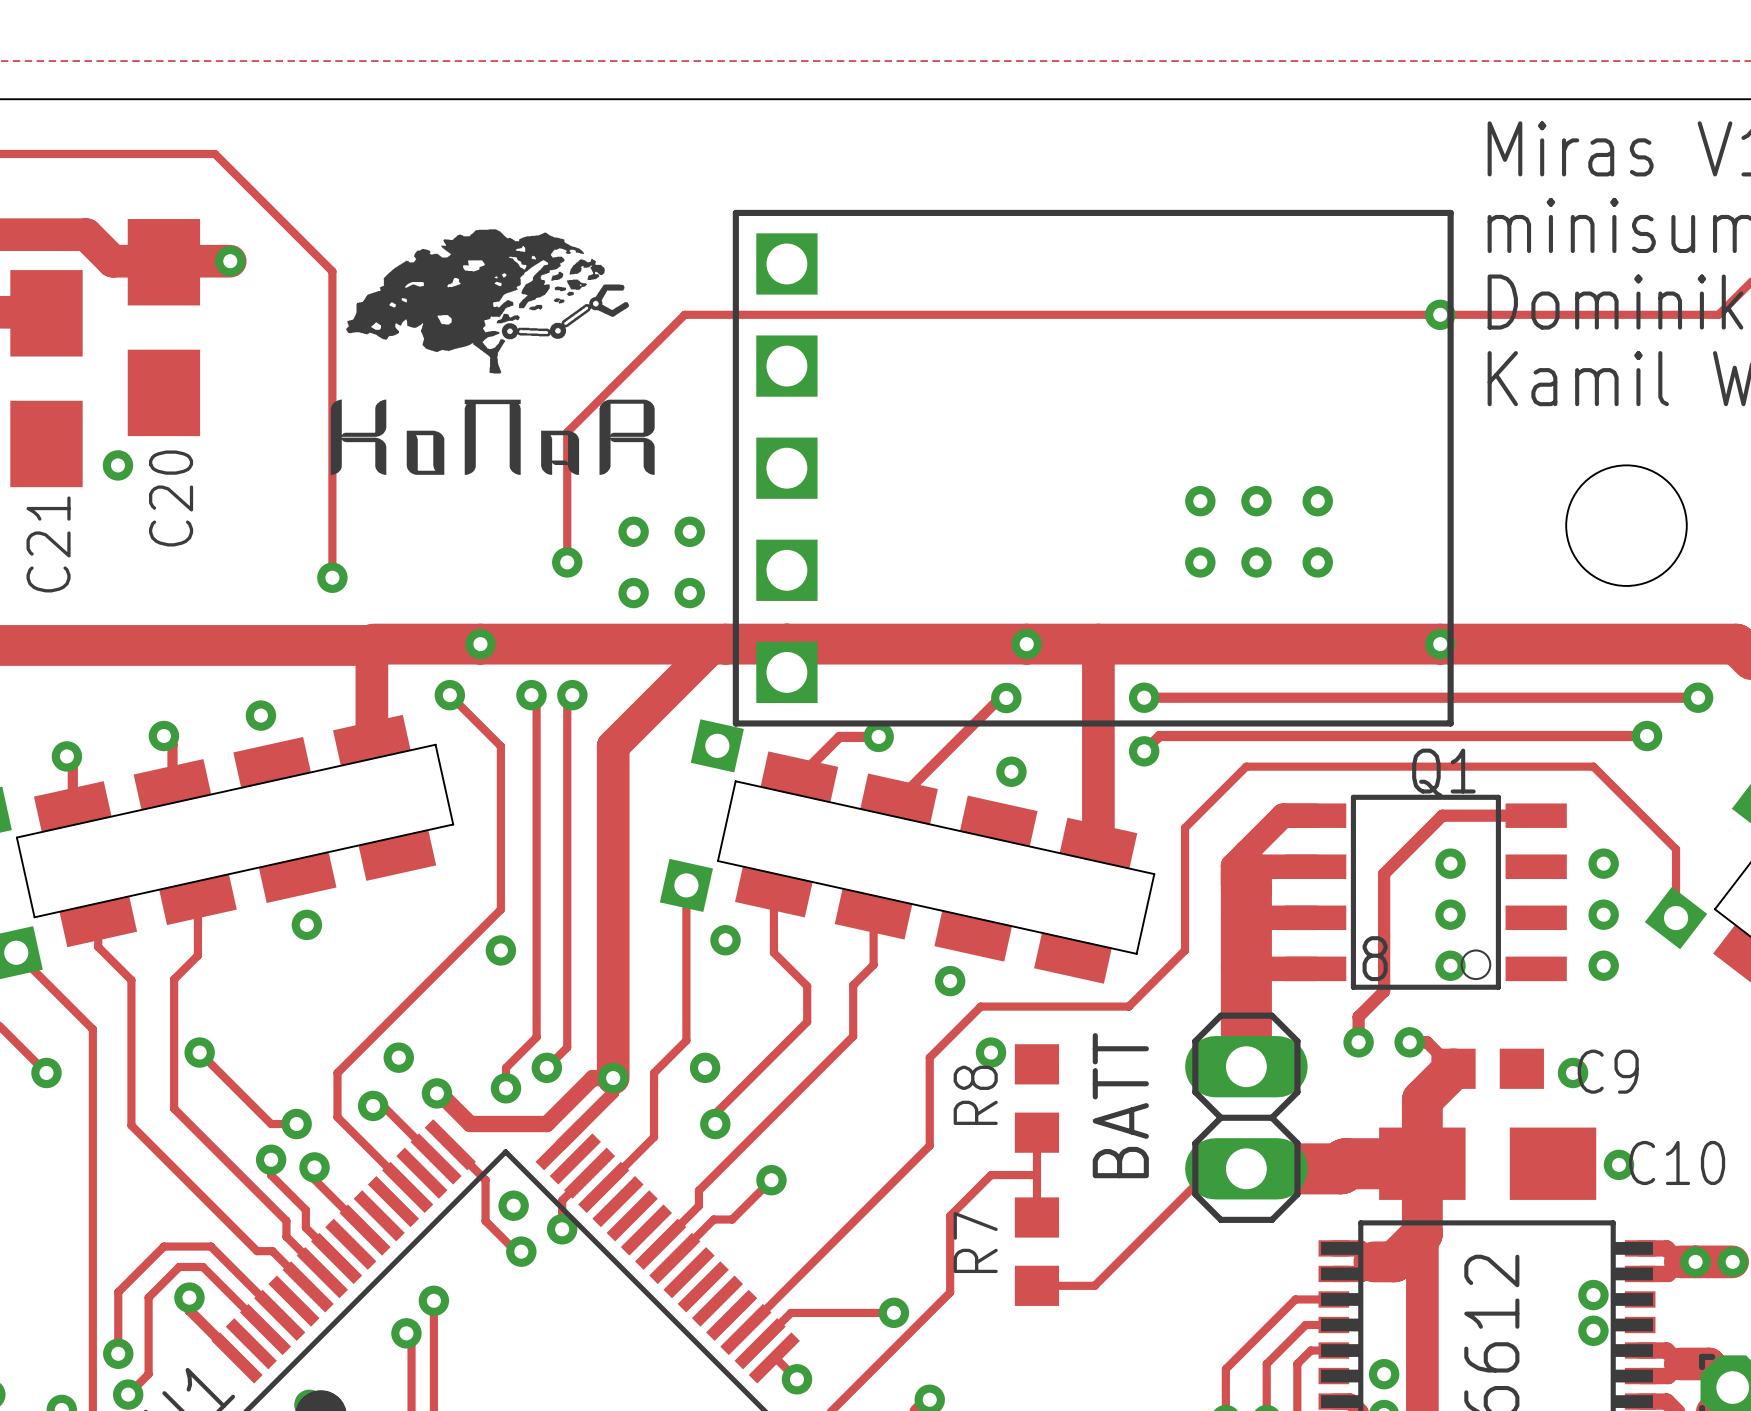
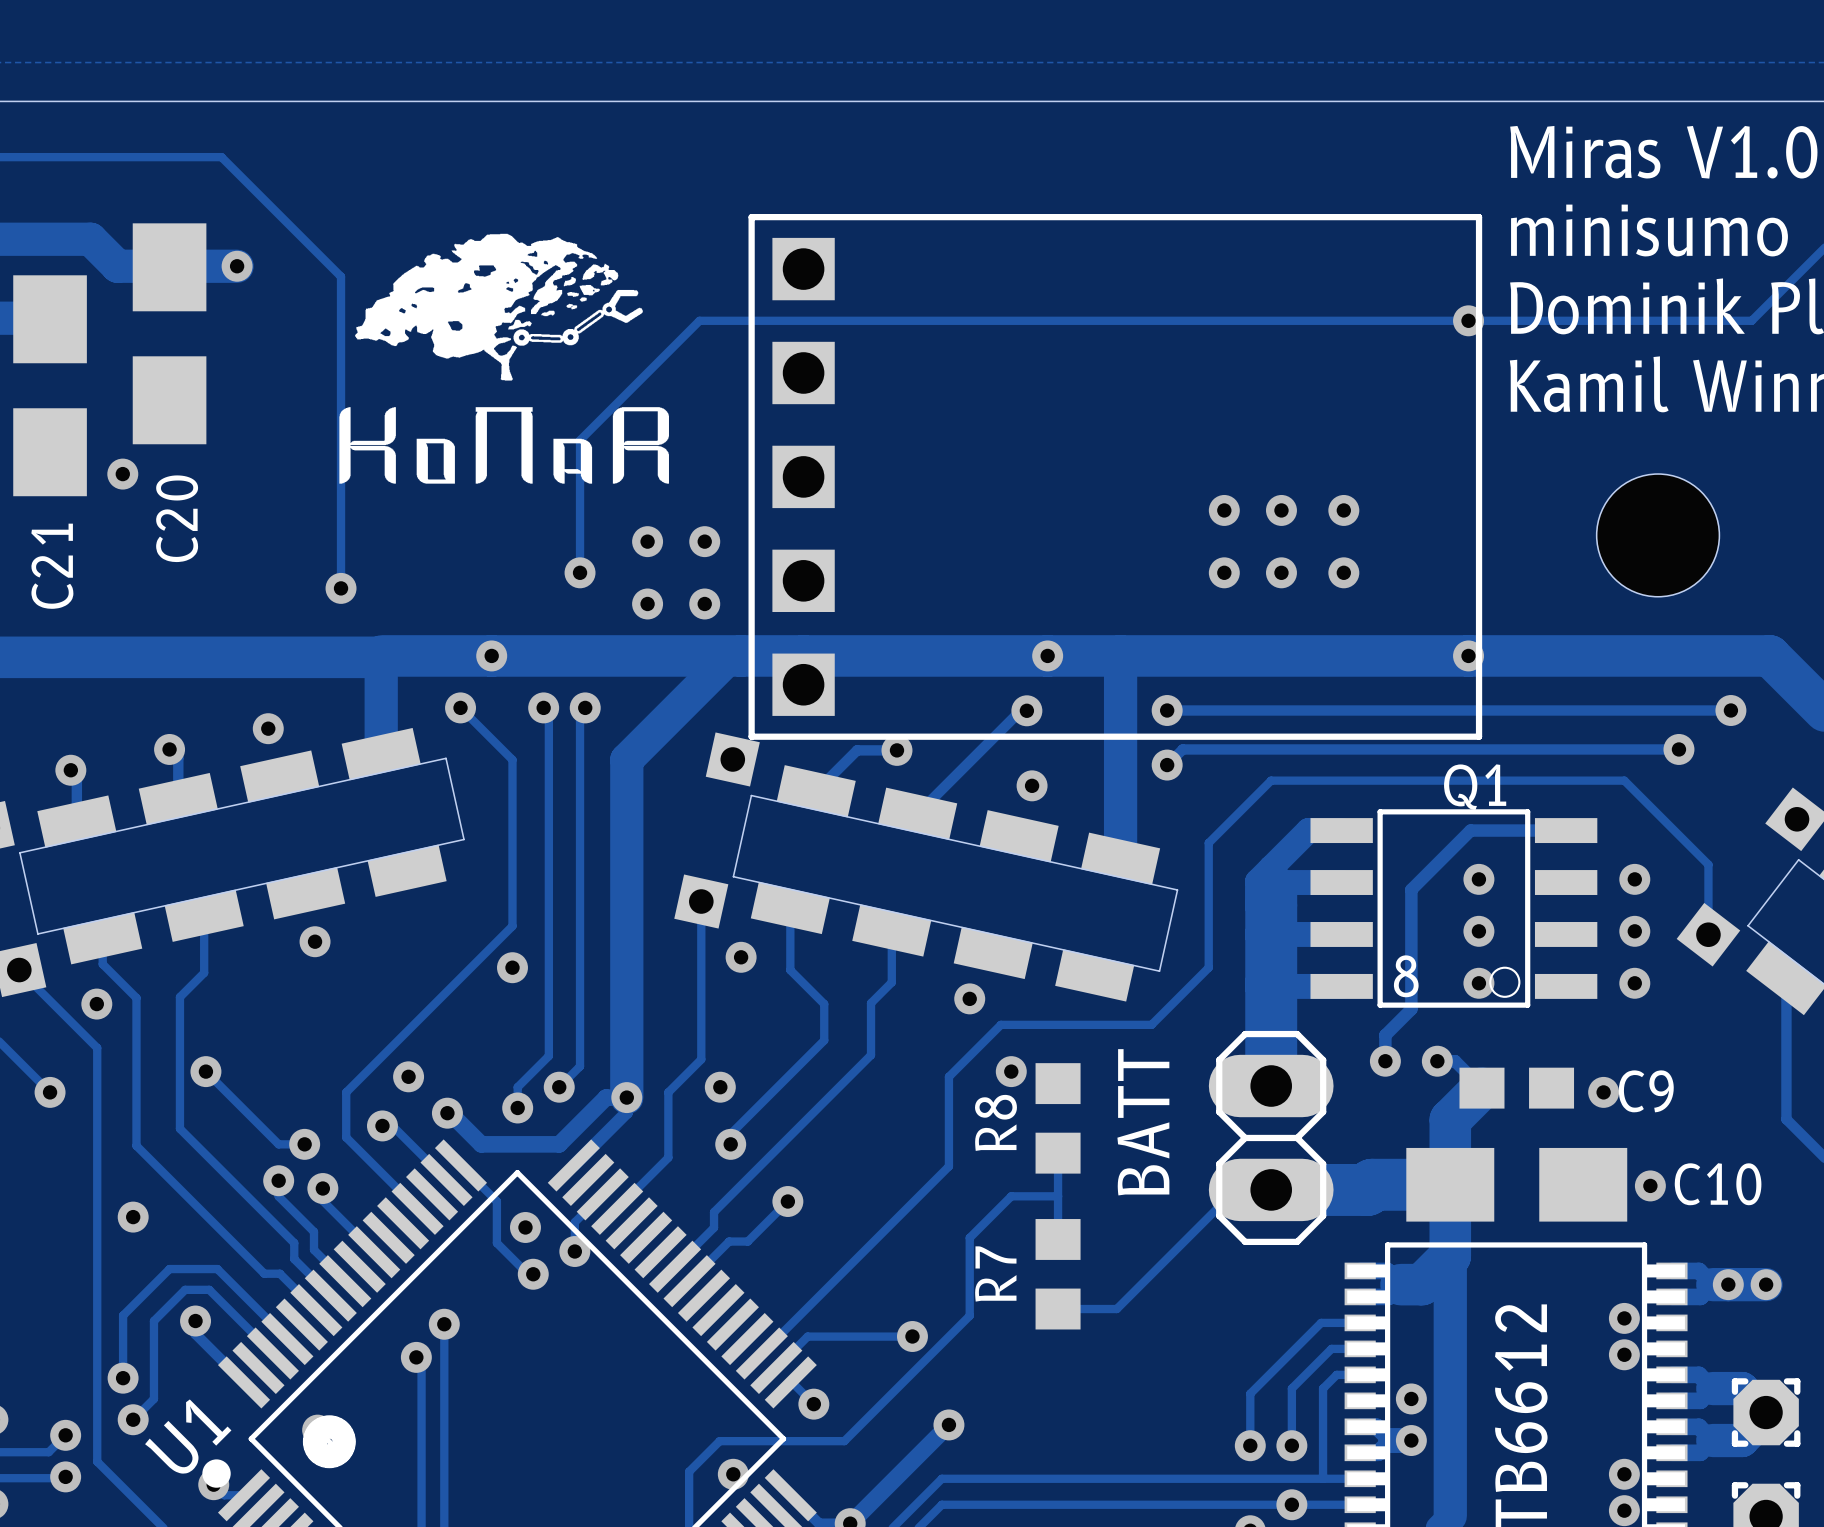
via: none -> (96, 1004)
via: none -> (133, 1217)

